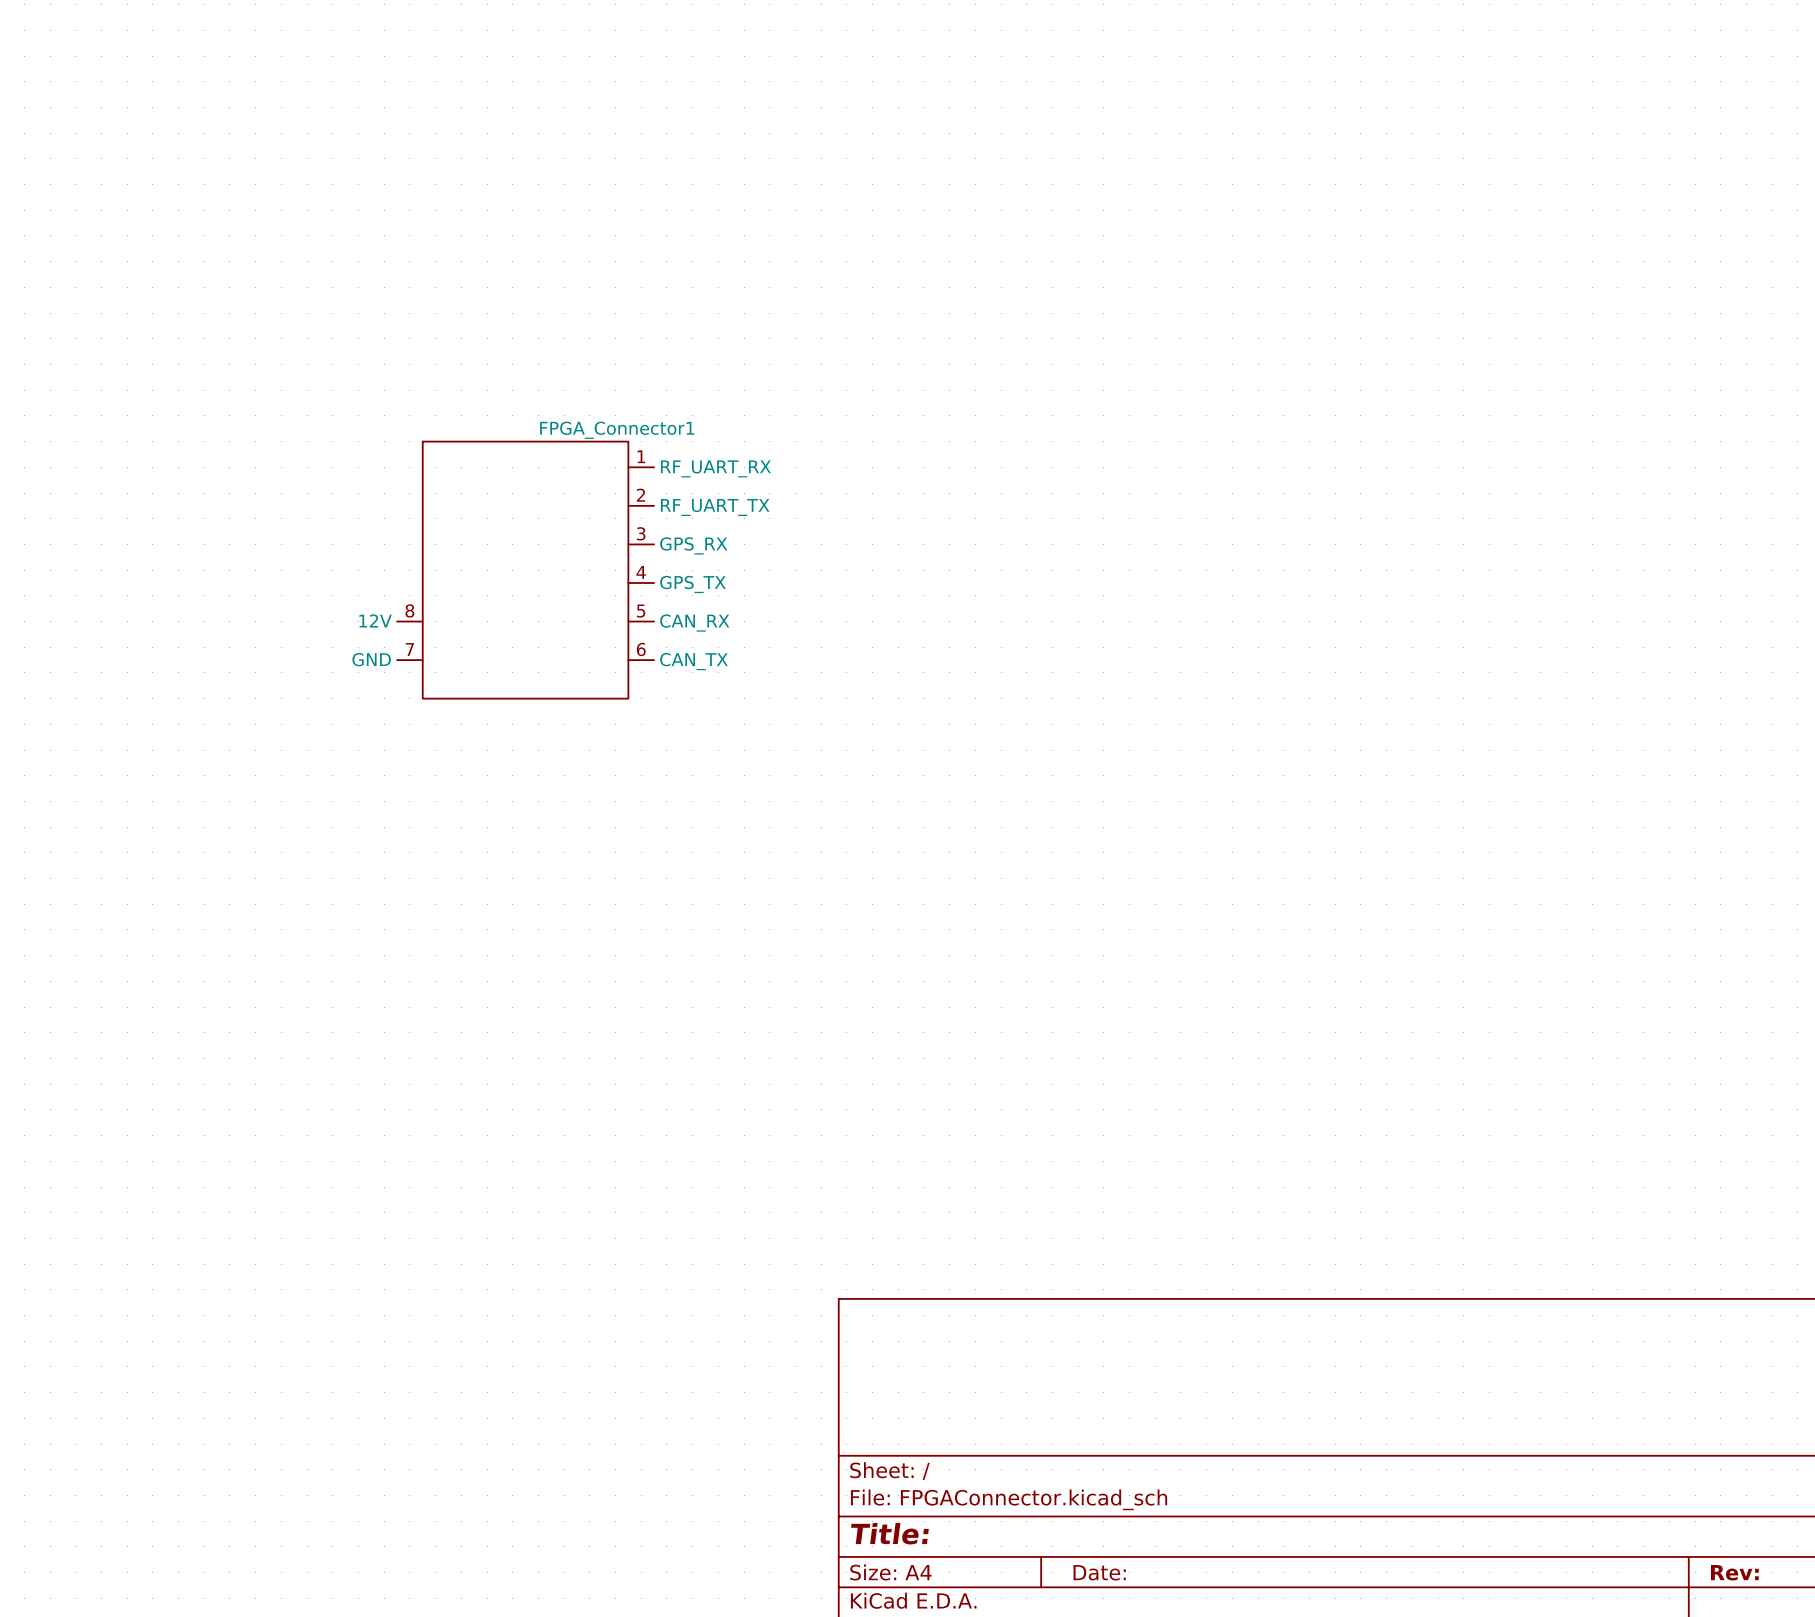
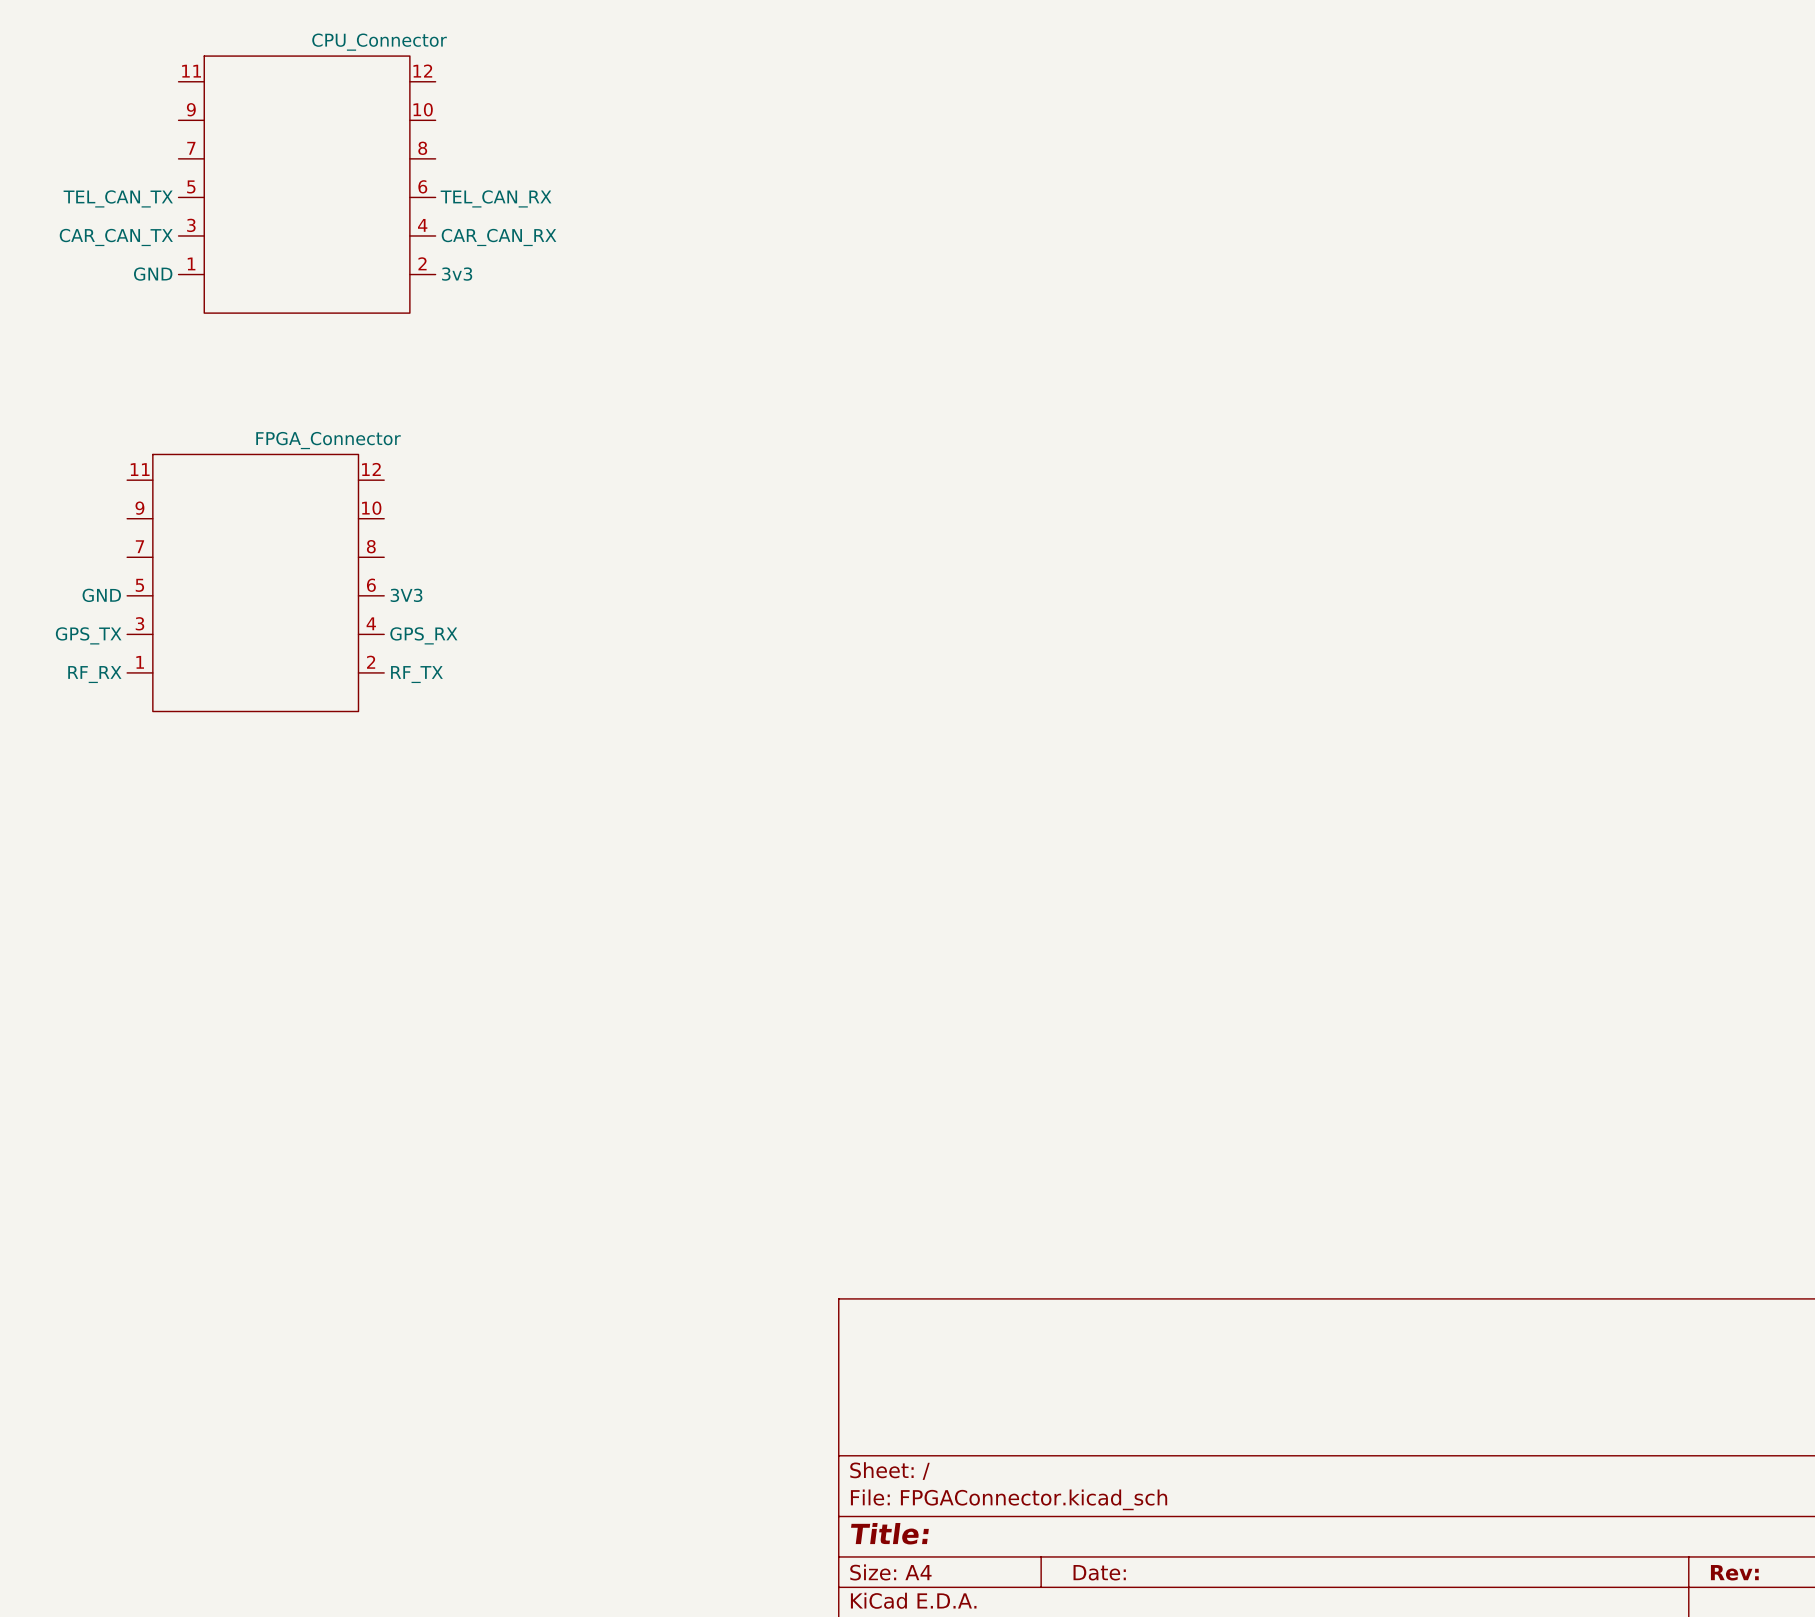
CPU_Connector: none -> (307, 184)
FPGA_Connector1: (525, 570) -> none
FPGA_Connector: none -> (255, 582)

